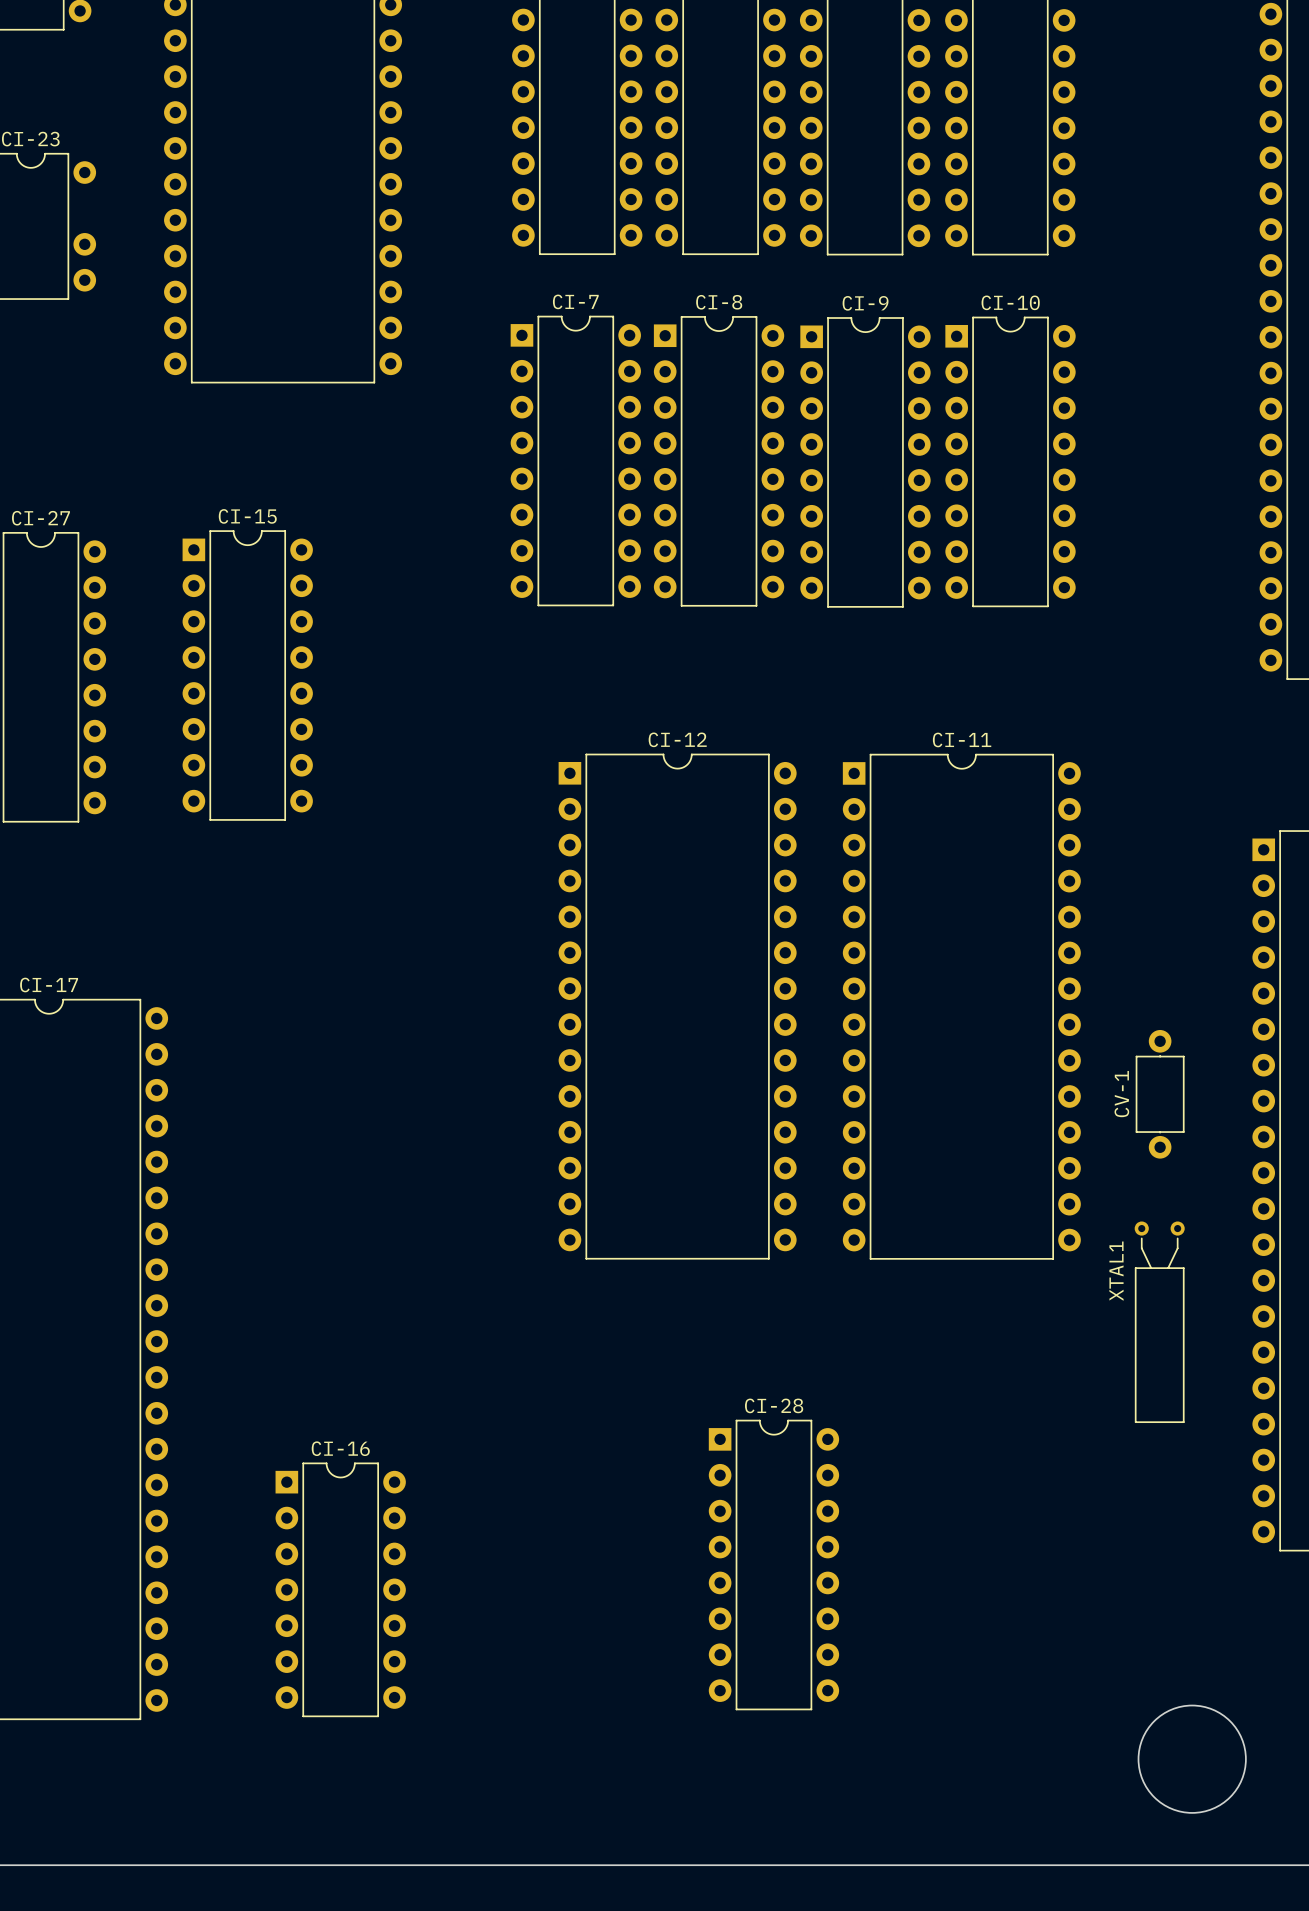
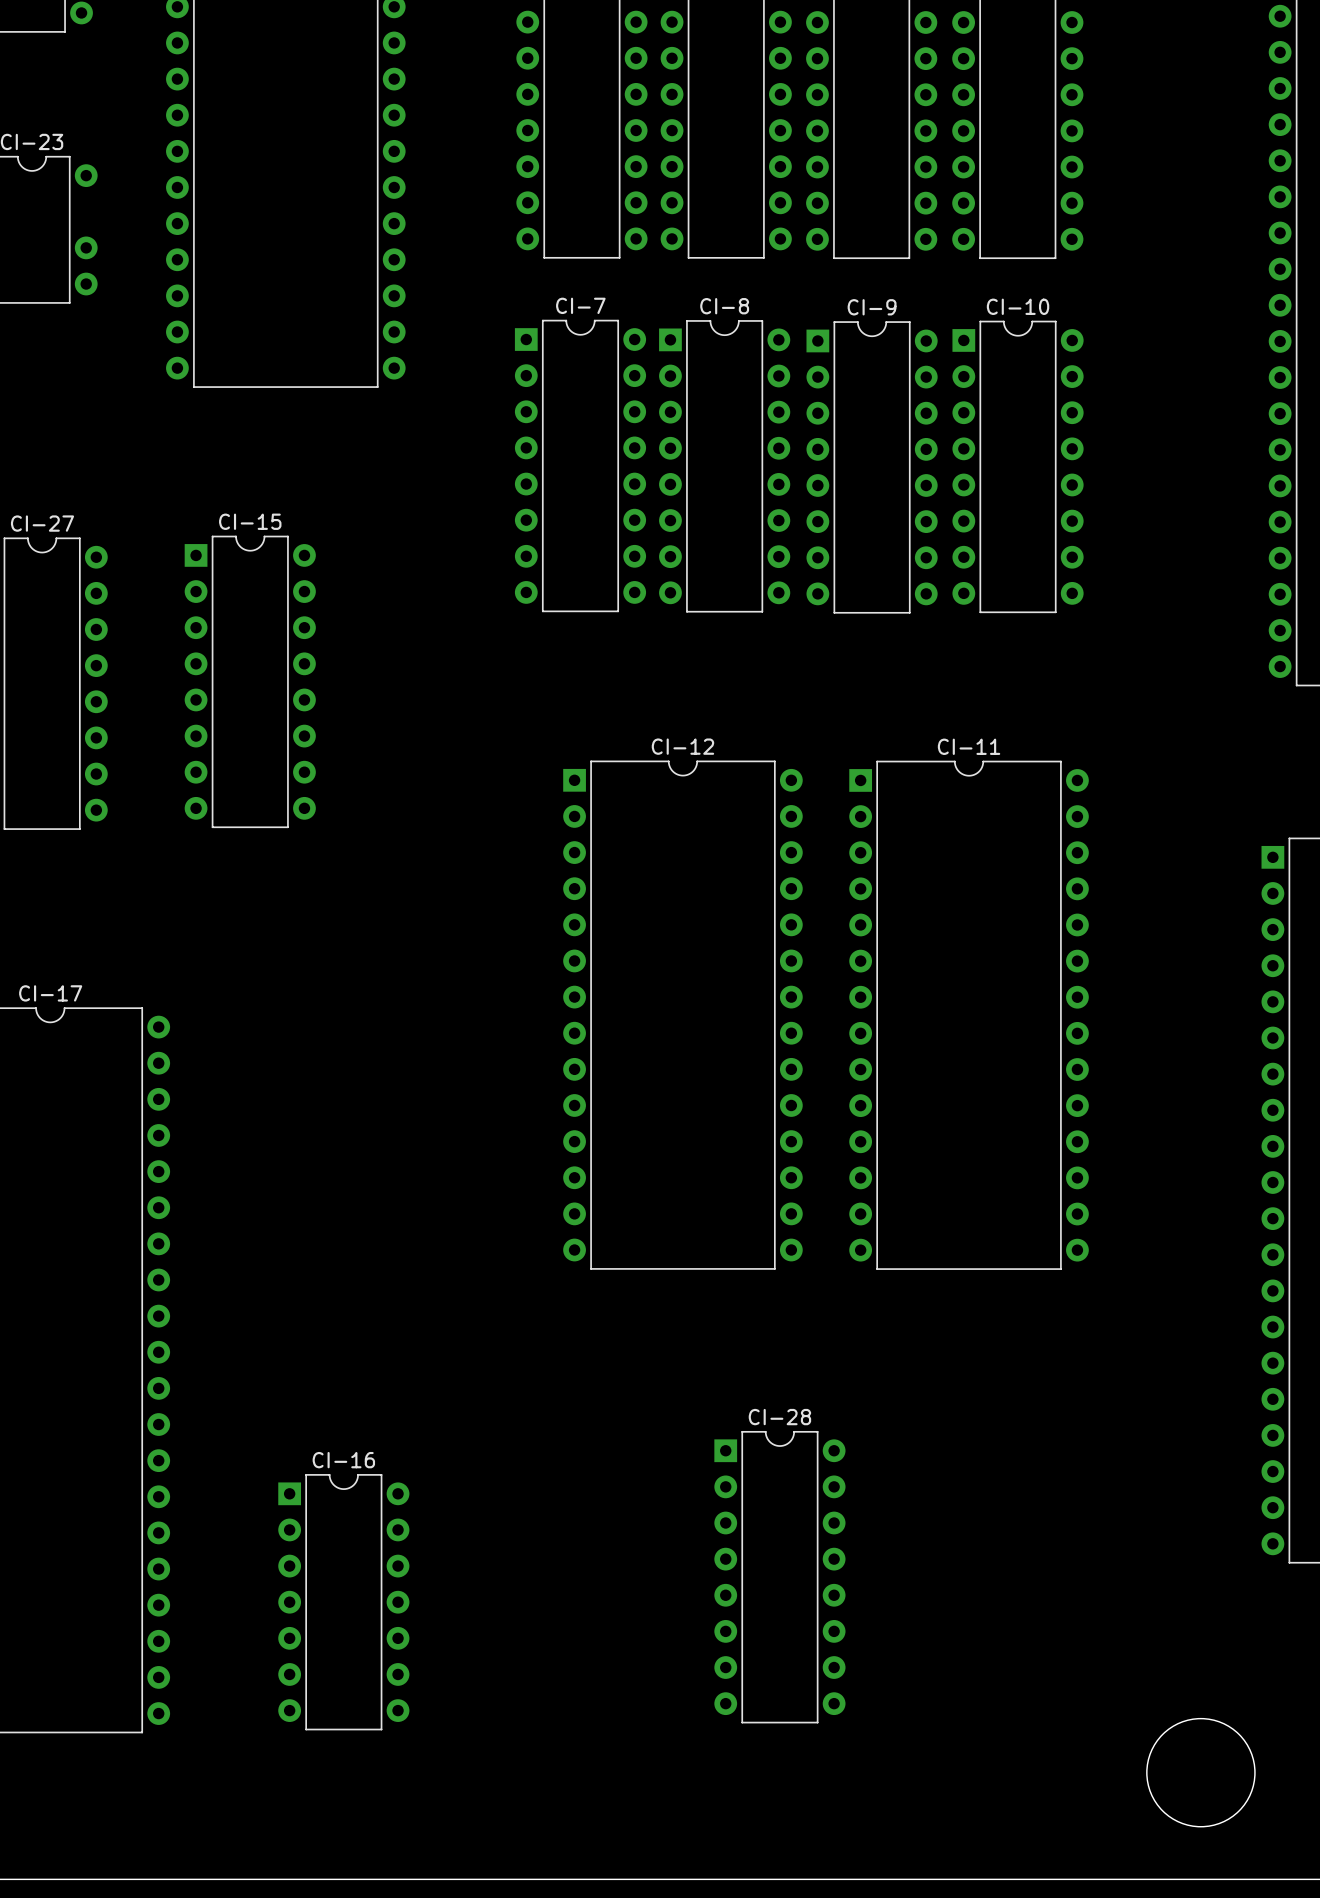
CV-1: (1160, 1094) -> none
XTAL1: (1159, 1322) -> none

